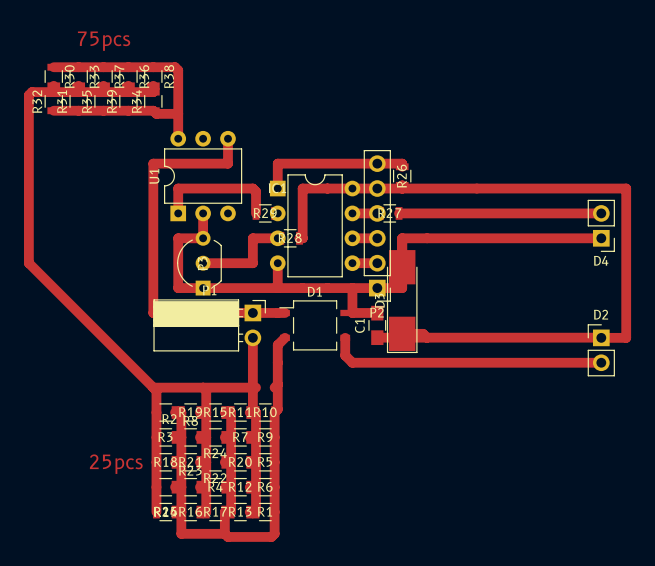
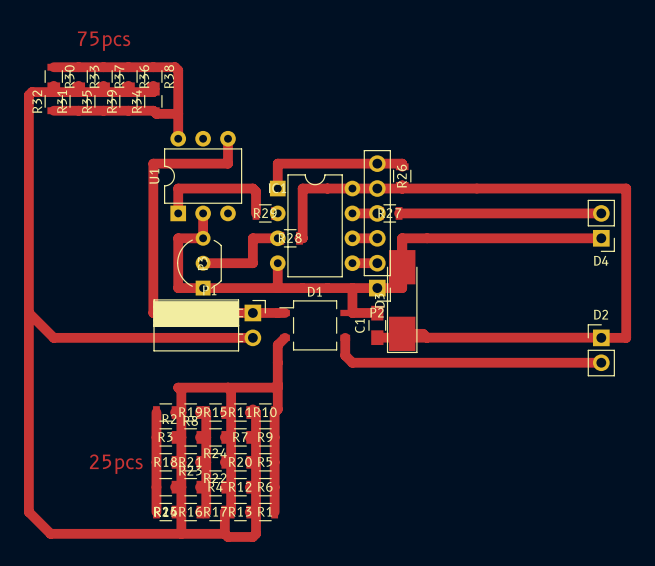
top track: (28, 263) (156, 390) (156, 412) -> (28, 263) (28, 512) (50, 533) (181, 533)
top track: (252, 337) (252, 409) -> (252, 337) (53, 337) (28, 312)
top track: (153, 387) (178, 387) -> (181, 412) (181, 390) (178, 387)
top track: (203, 387) (206, 390) (206, 412) -> (227, 387) (231, 390) (231, 412)
top track: none -> (256, 387) (277, 387)
top track: (274, 512) (274, 533) (271, 536) (252, 536) -> (256, 512) (256, 533) (252, 536)

